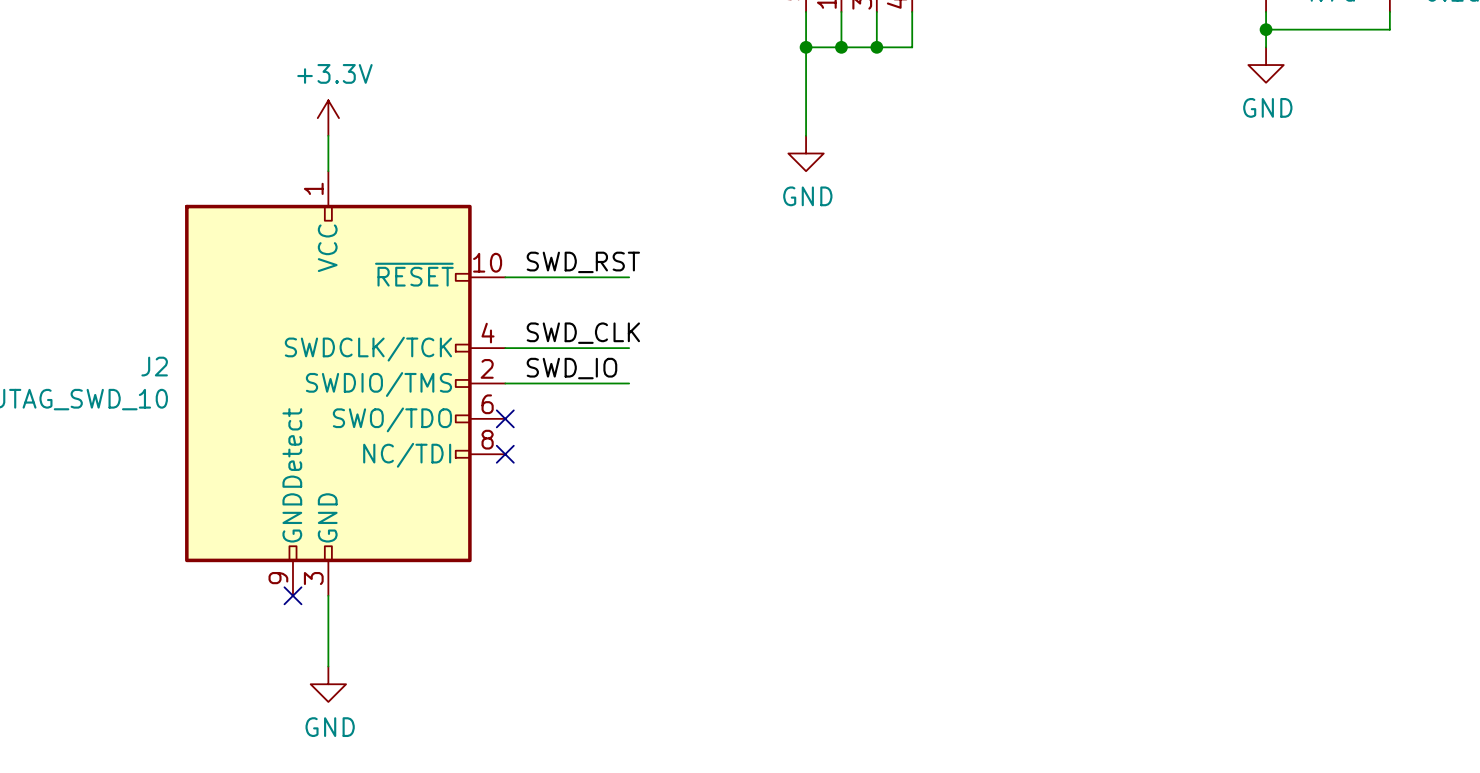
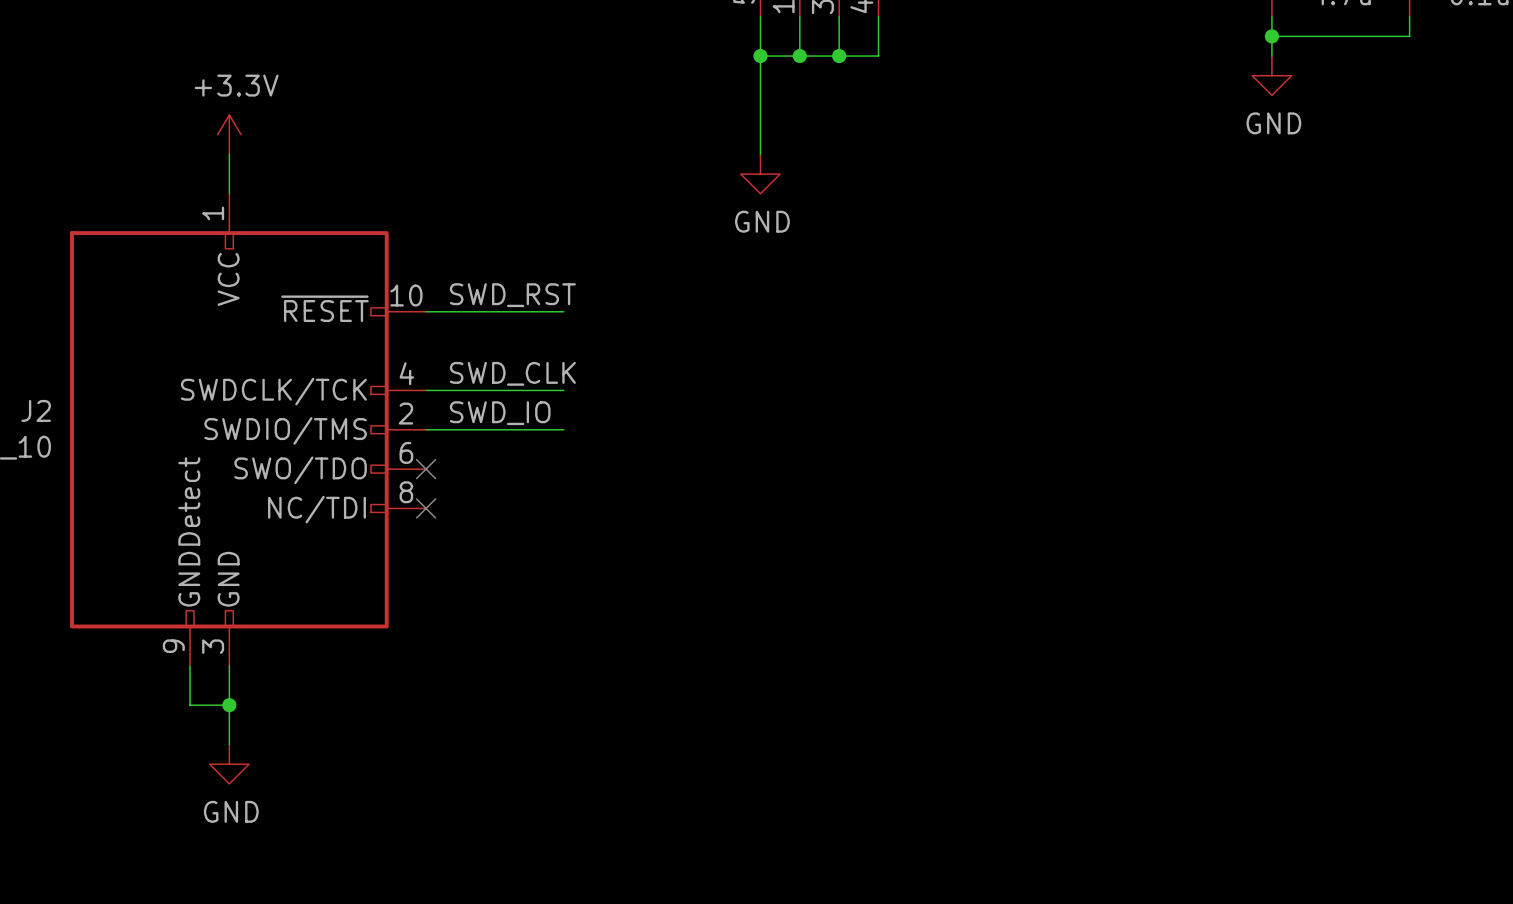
wire: none -> (190, 665) (190, 705) (229, 705)
no-connect mark: (292, 595) -> none
junction: none -> (229, 705)

